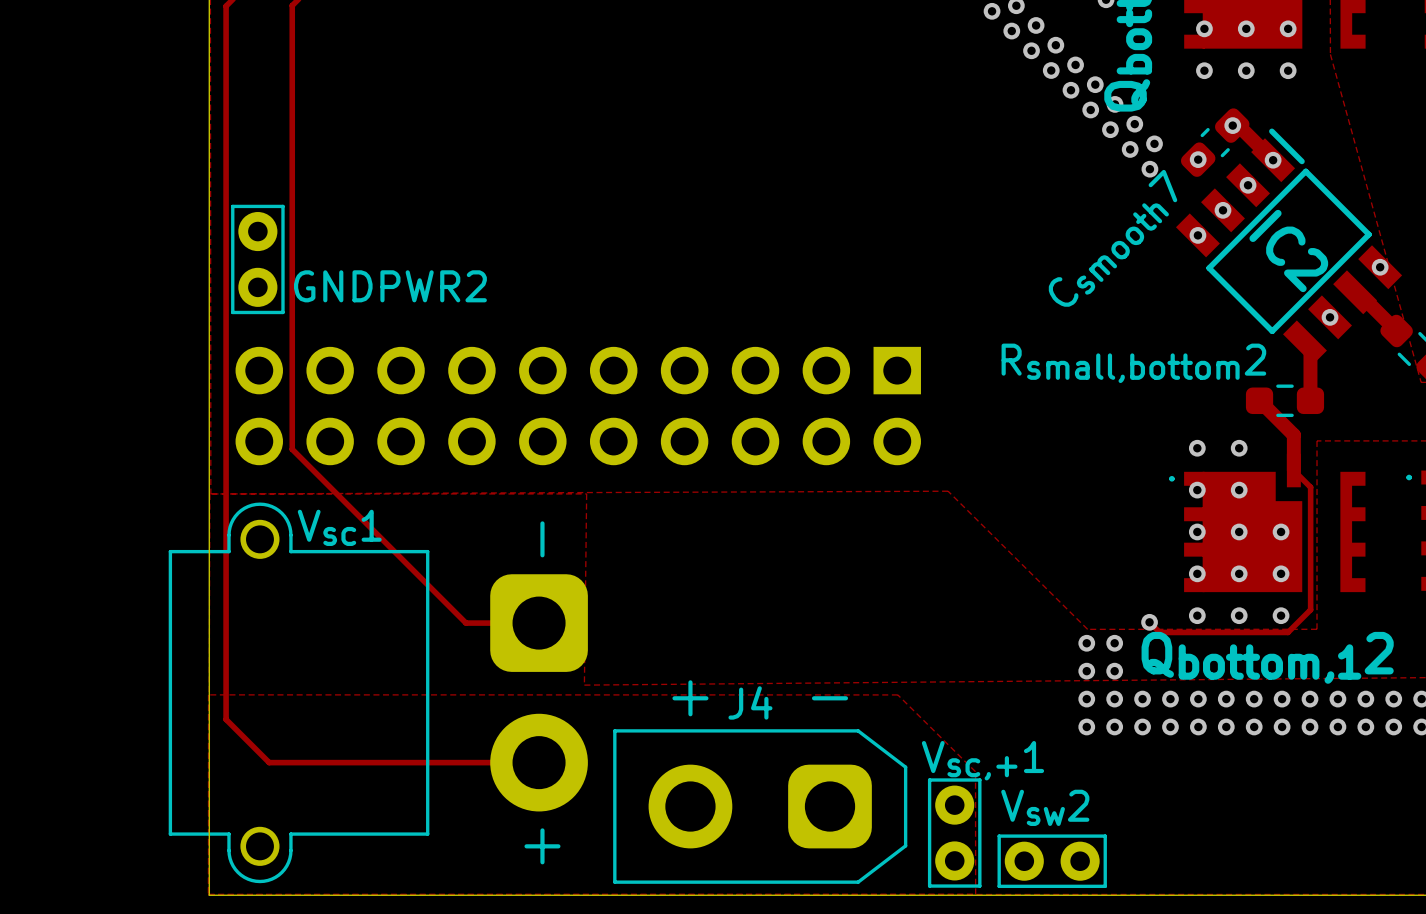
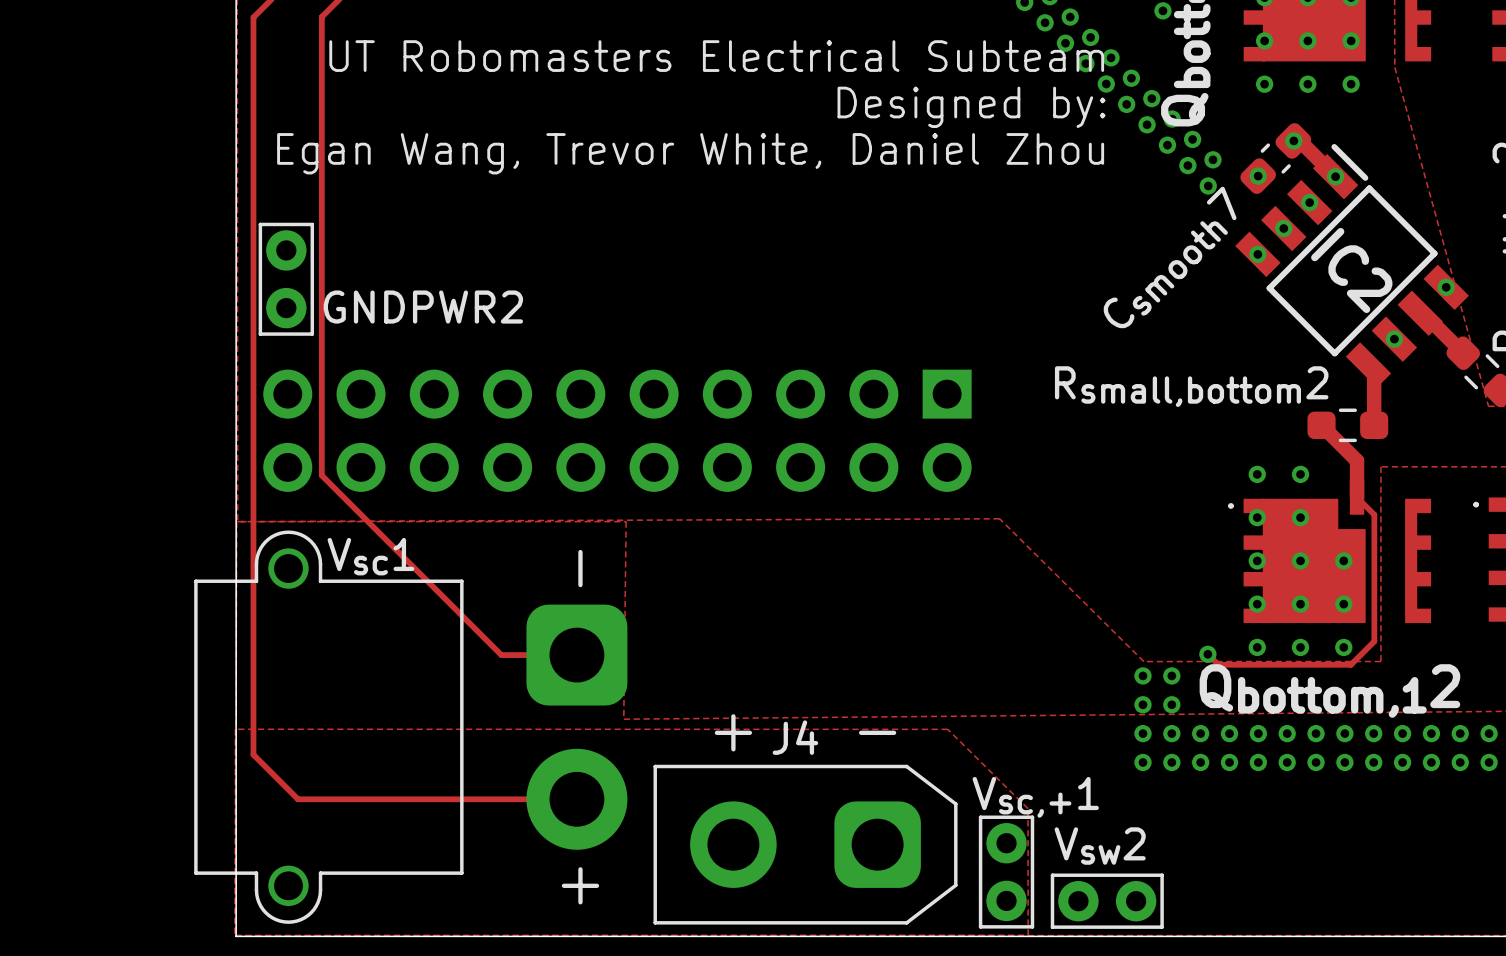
text: none -> UT Robomasters Electrical Subteam (716, 56)
text: none -> Designed by: (971, 107)
text: none -> Egan Wang, Trevor White, Daniel Zhou (690, 153)

